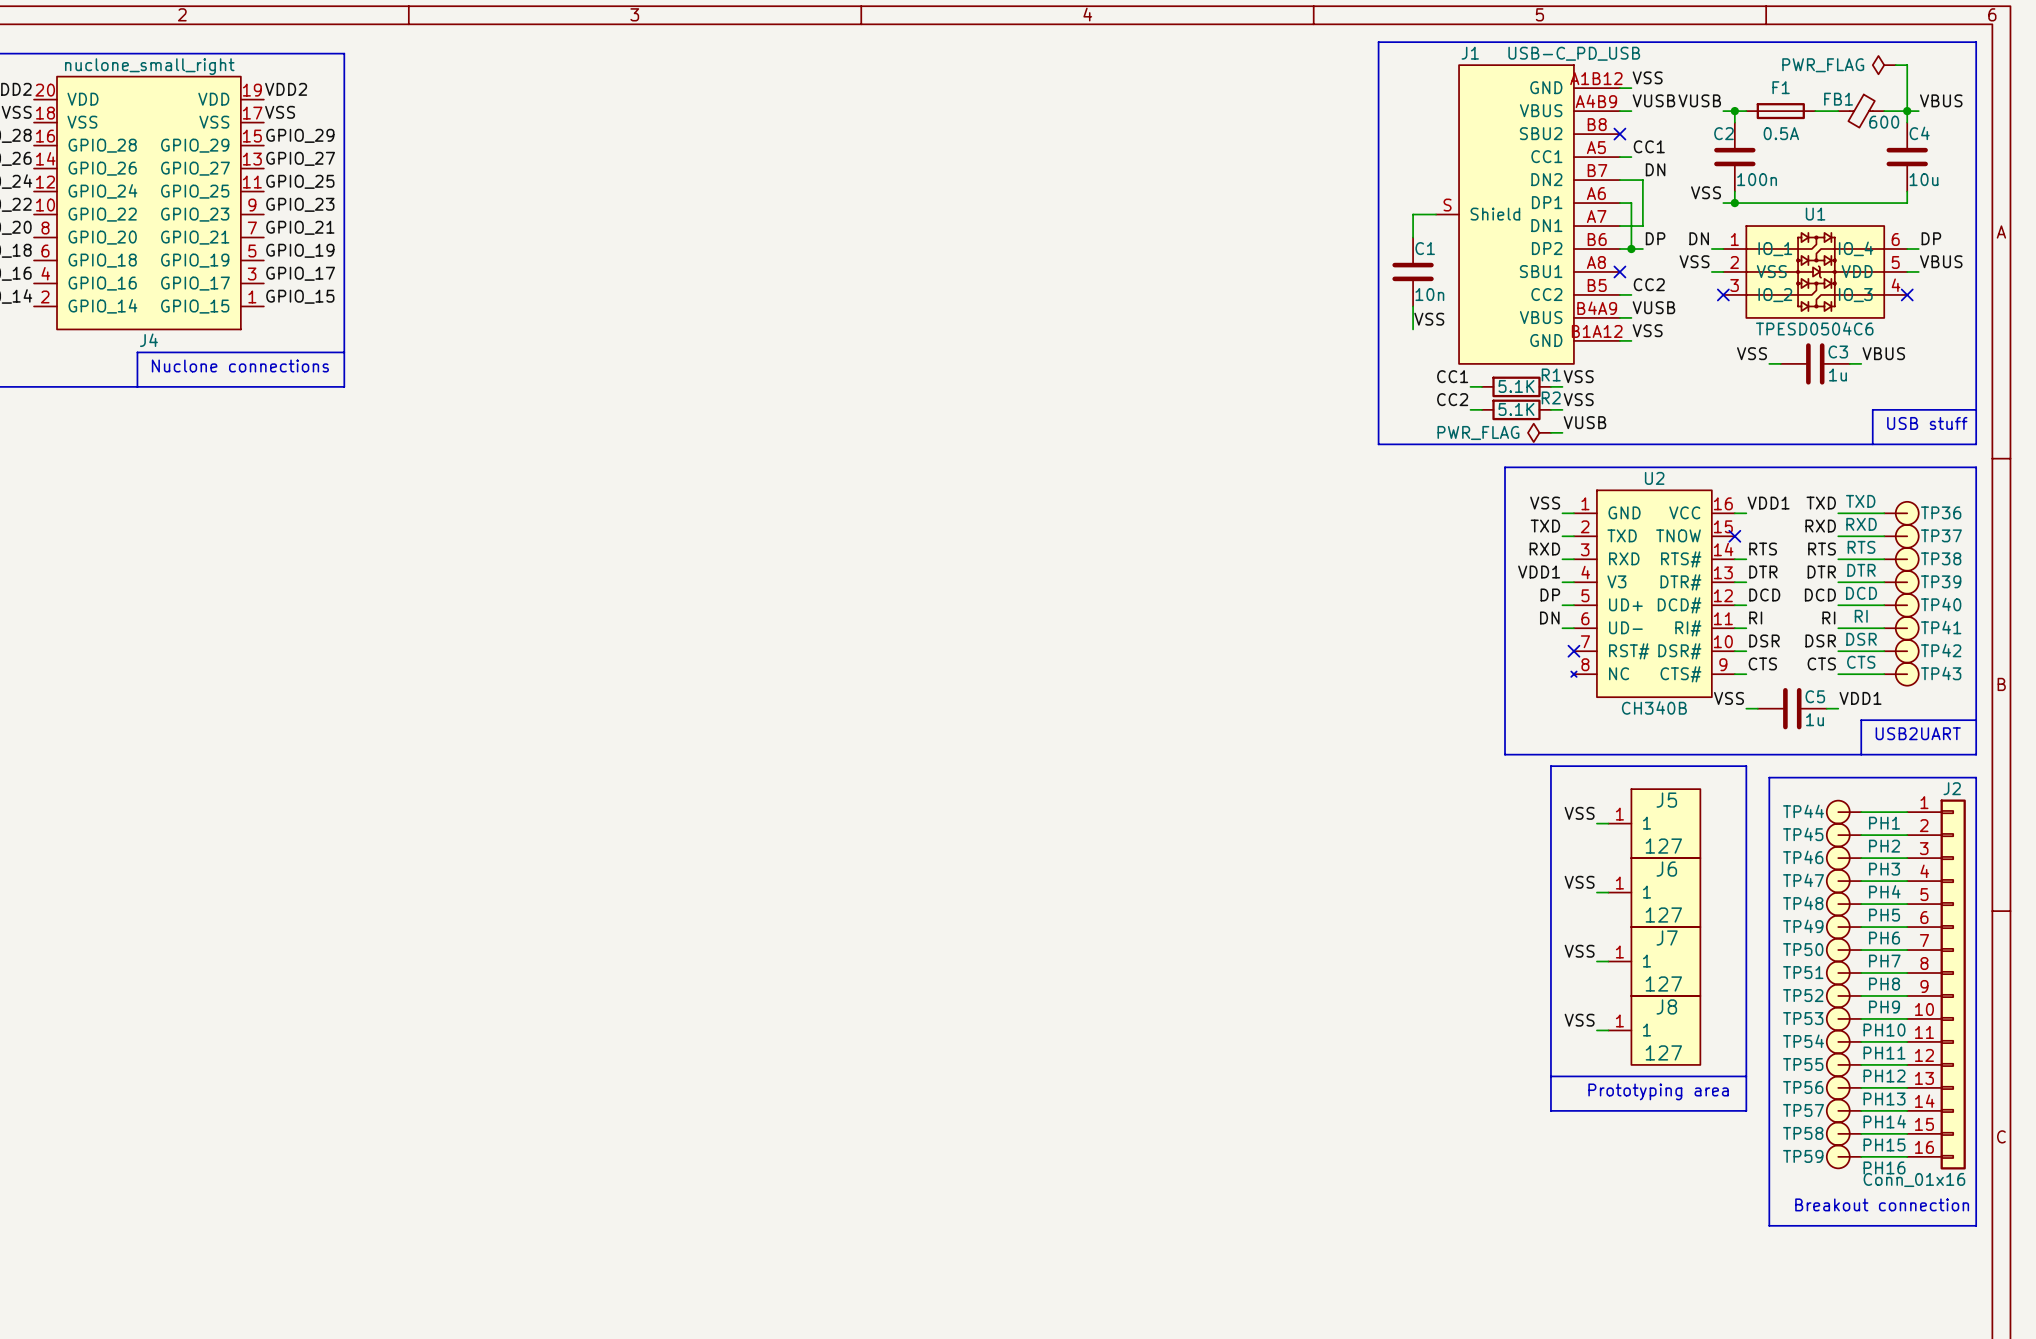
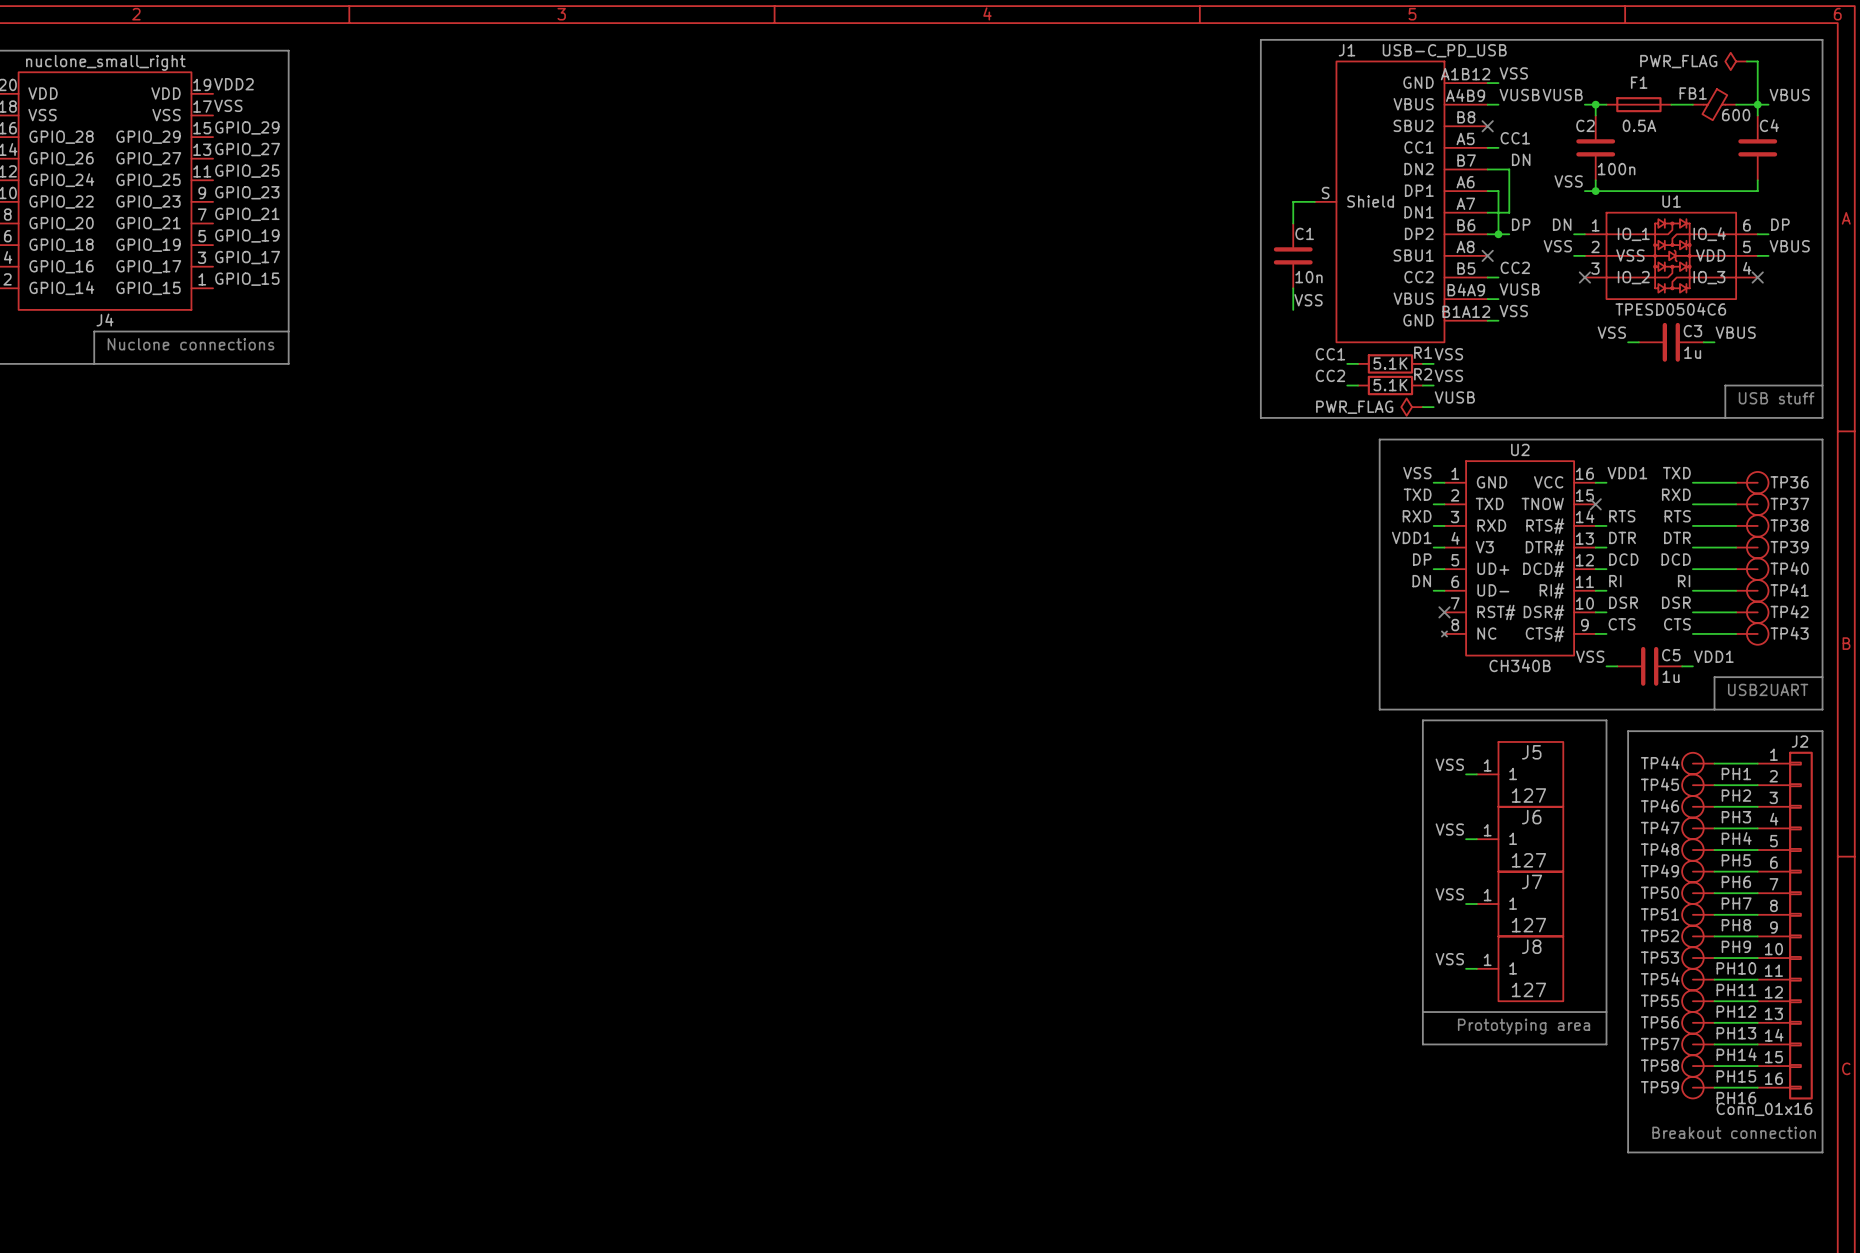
C4 value: 10u (1924, 179) -> none
TP36 value: TXD (1860, 501) -> none
TP37 value: RXD (1861, 524) -> none
TP38 value: RTS (1861, 547) -> none
TP39 value: DTR (1861, 570) -> none
TP40 value: DCD (1861, 593) -> none
TP41 value: RI (1861, 616) -> none
TP42 value: DSR (1861, 639) -> none
TP43 value: CTS (1861, 662) -> none

